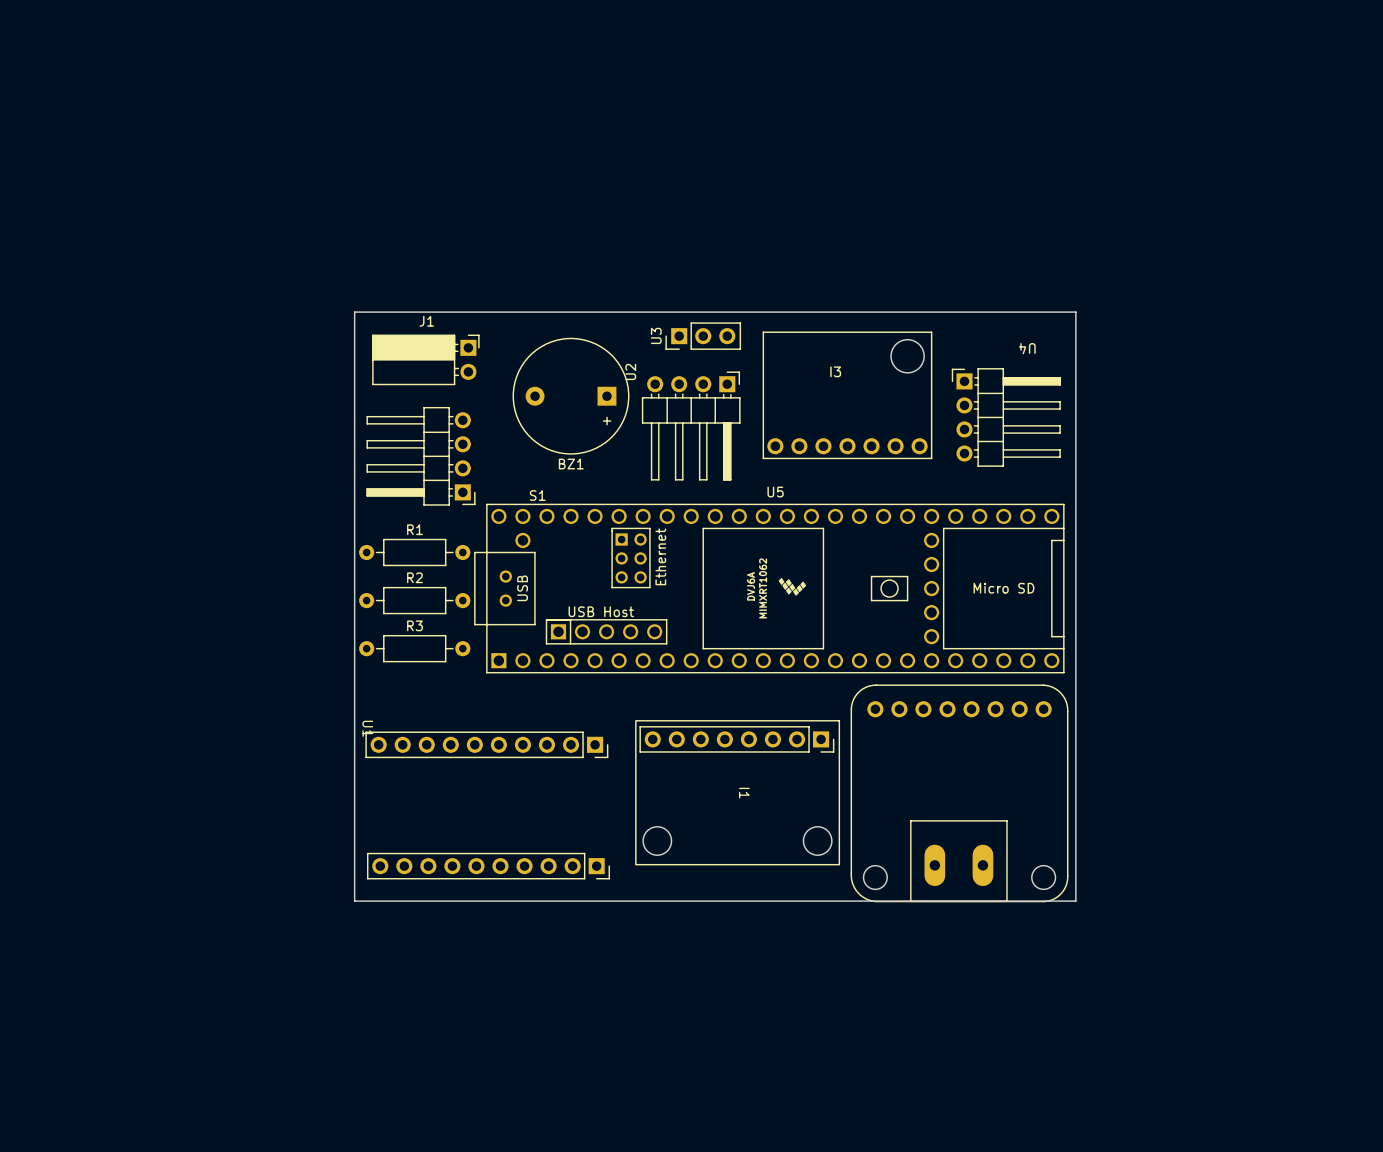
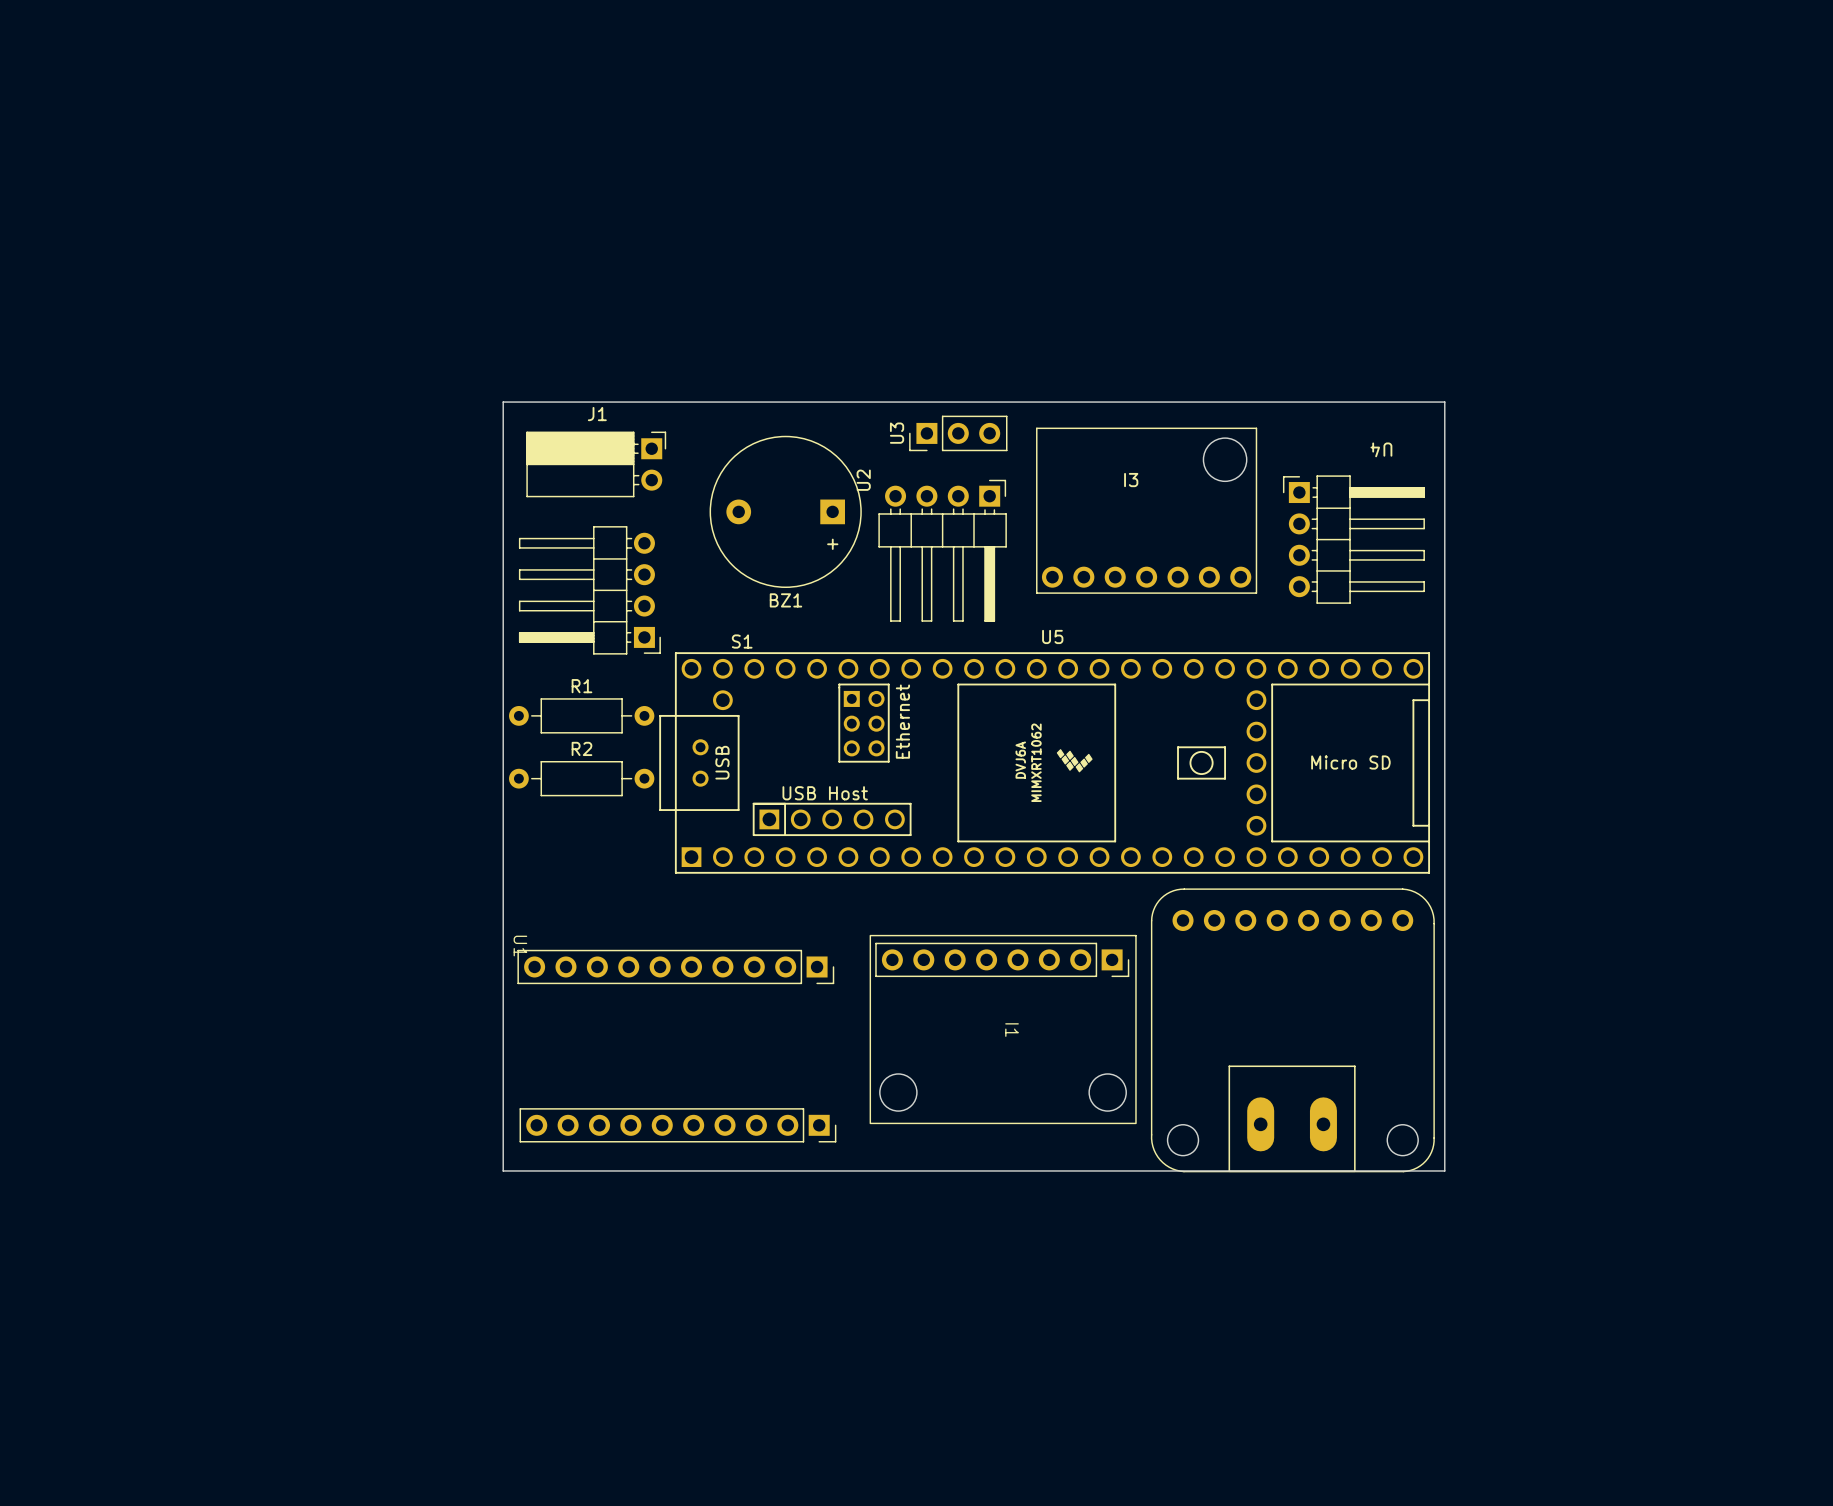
R3: (414, 648) -> none

